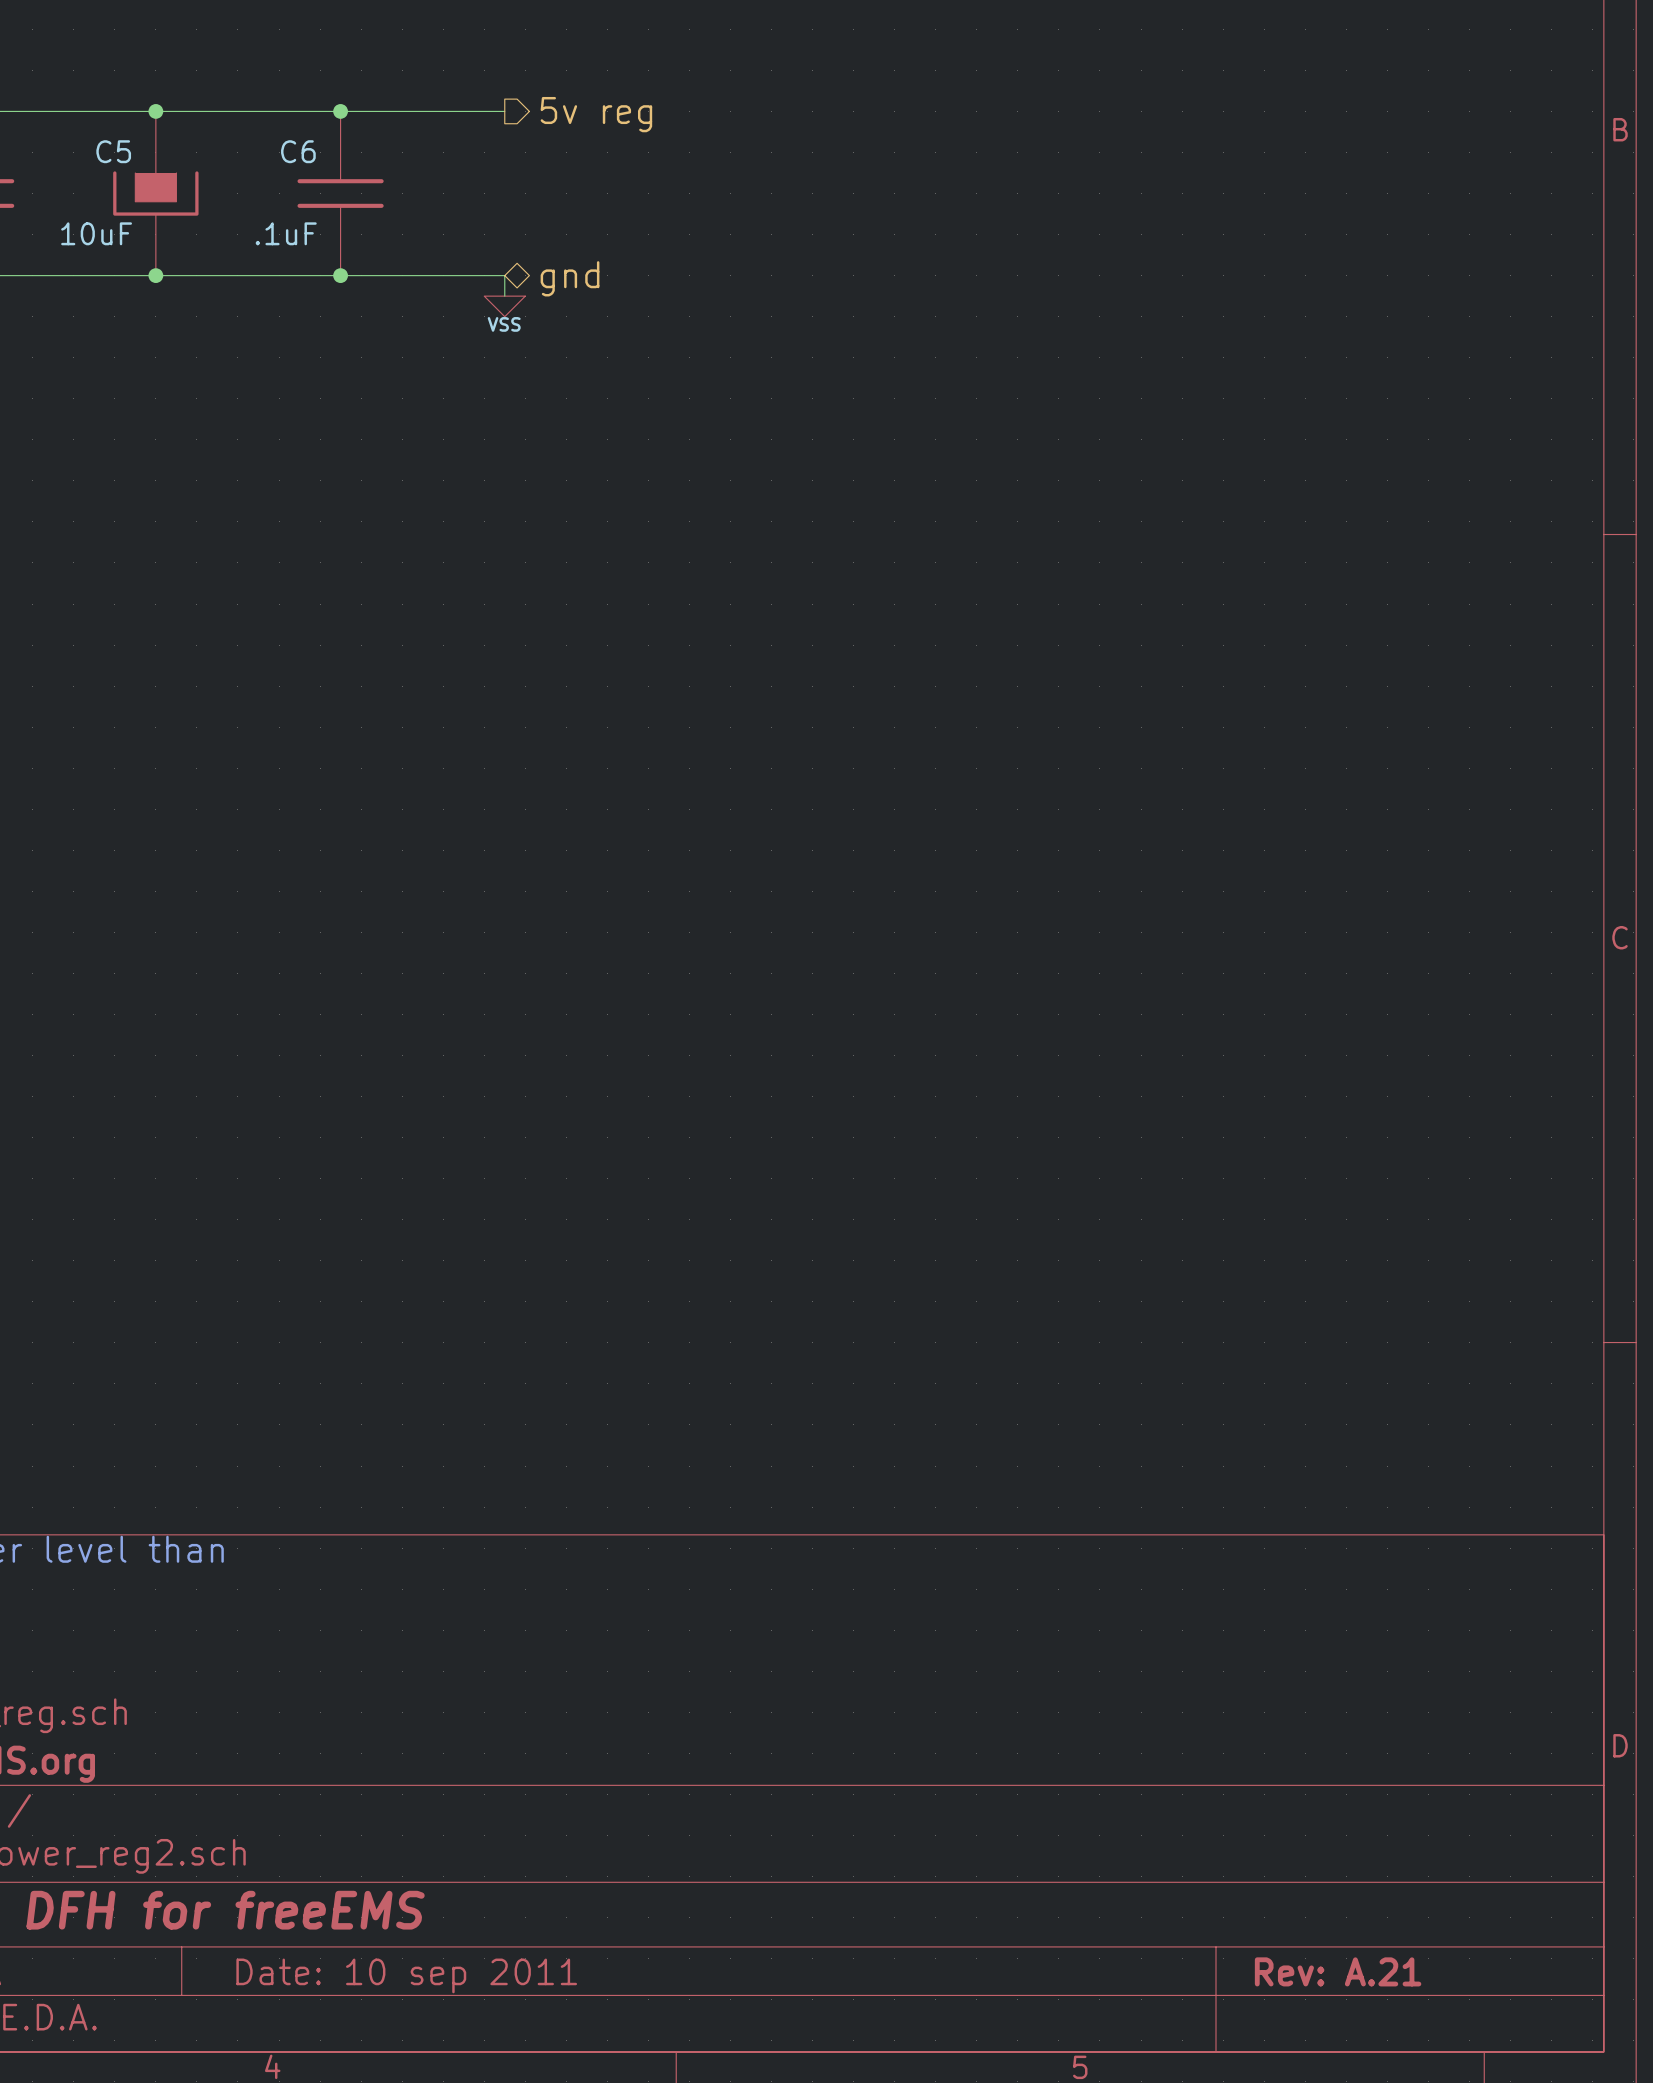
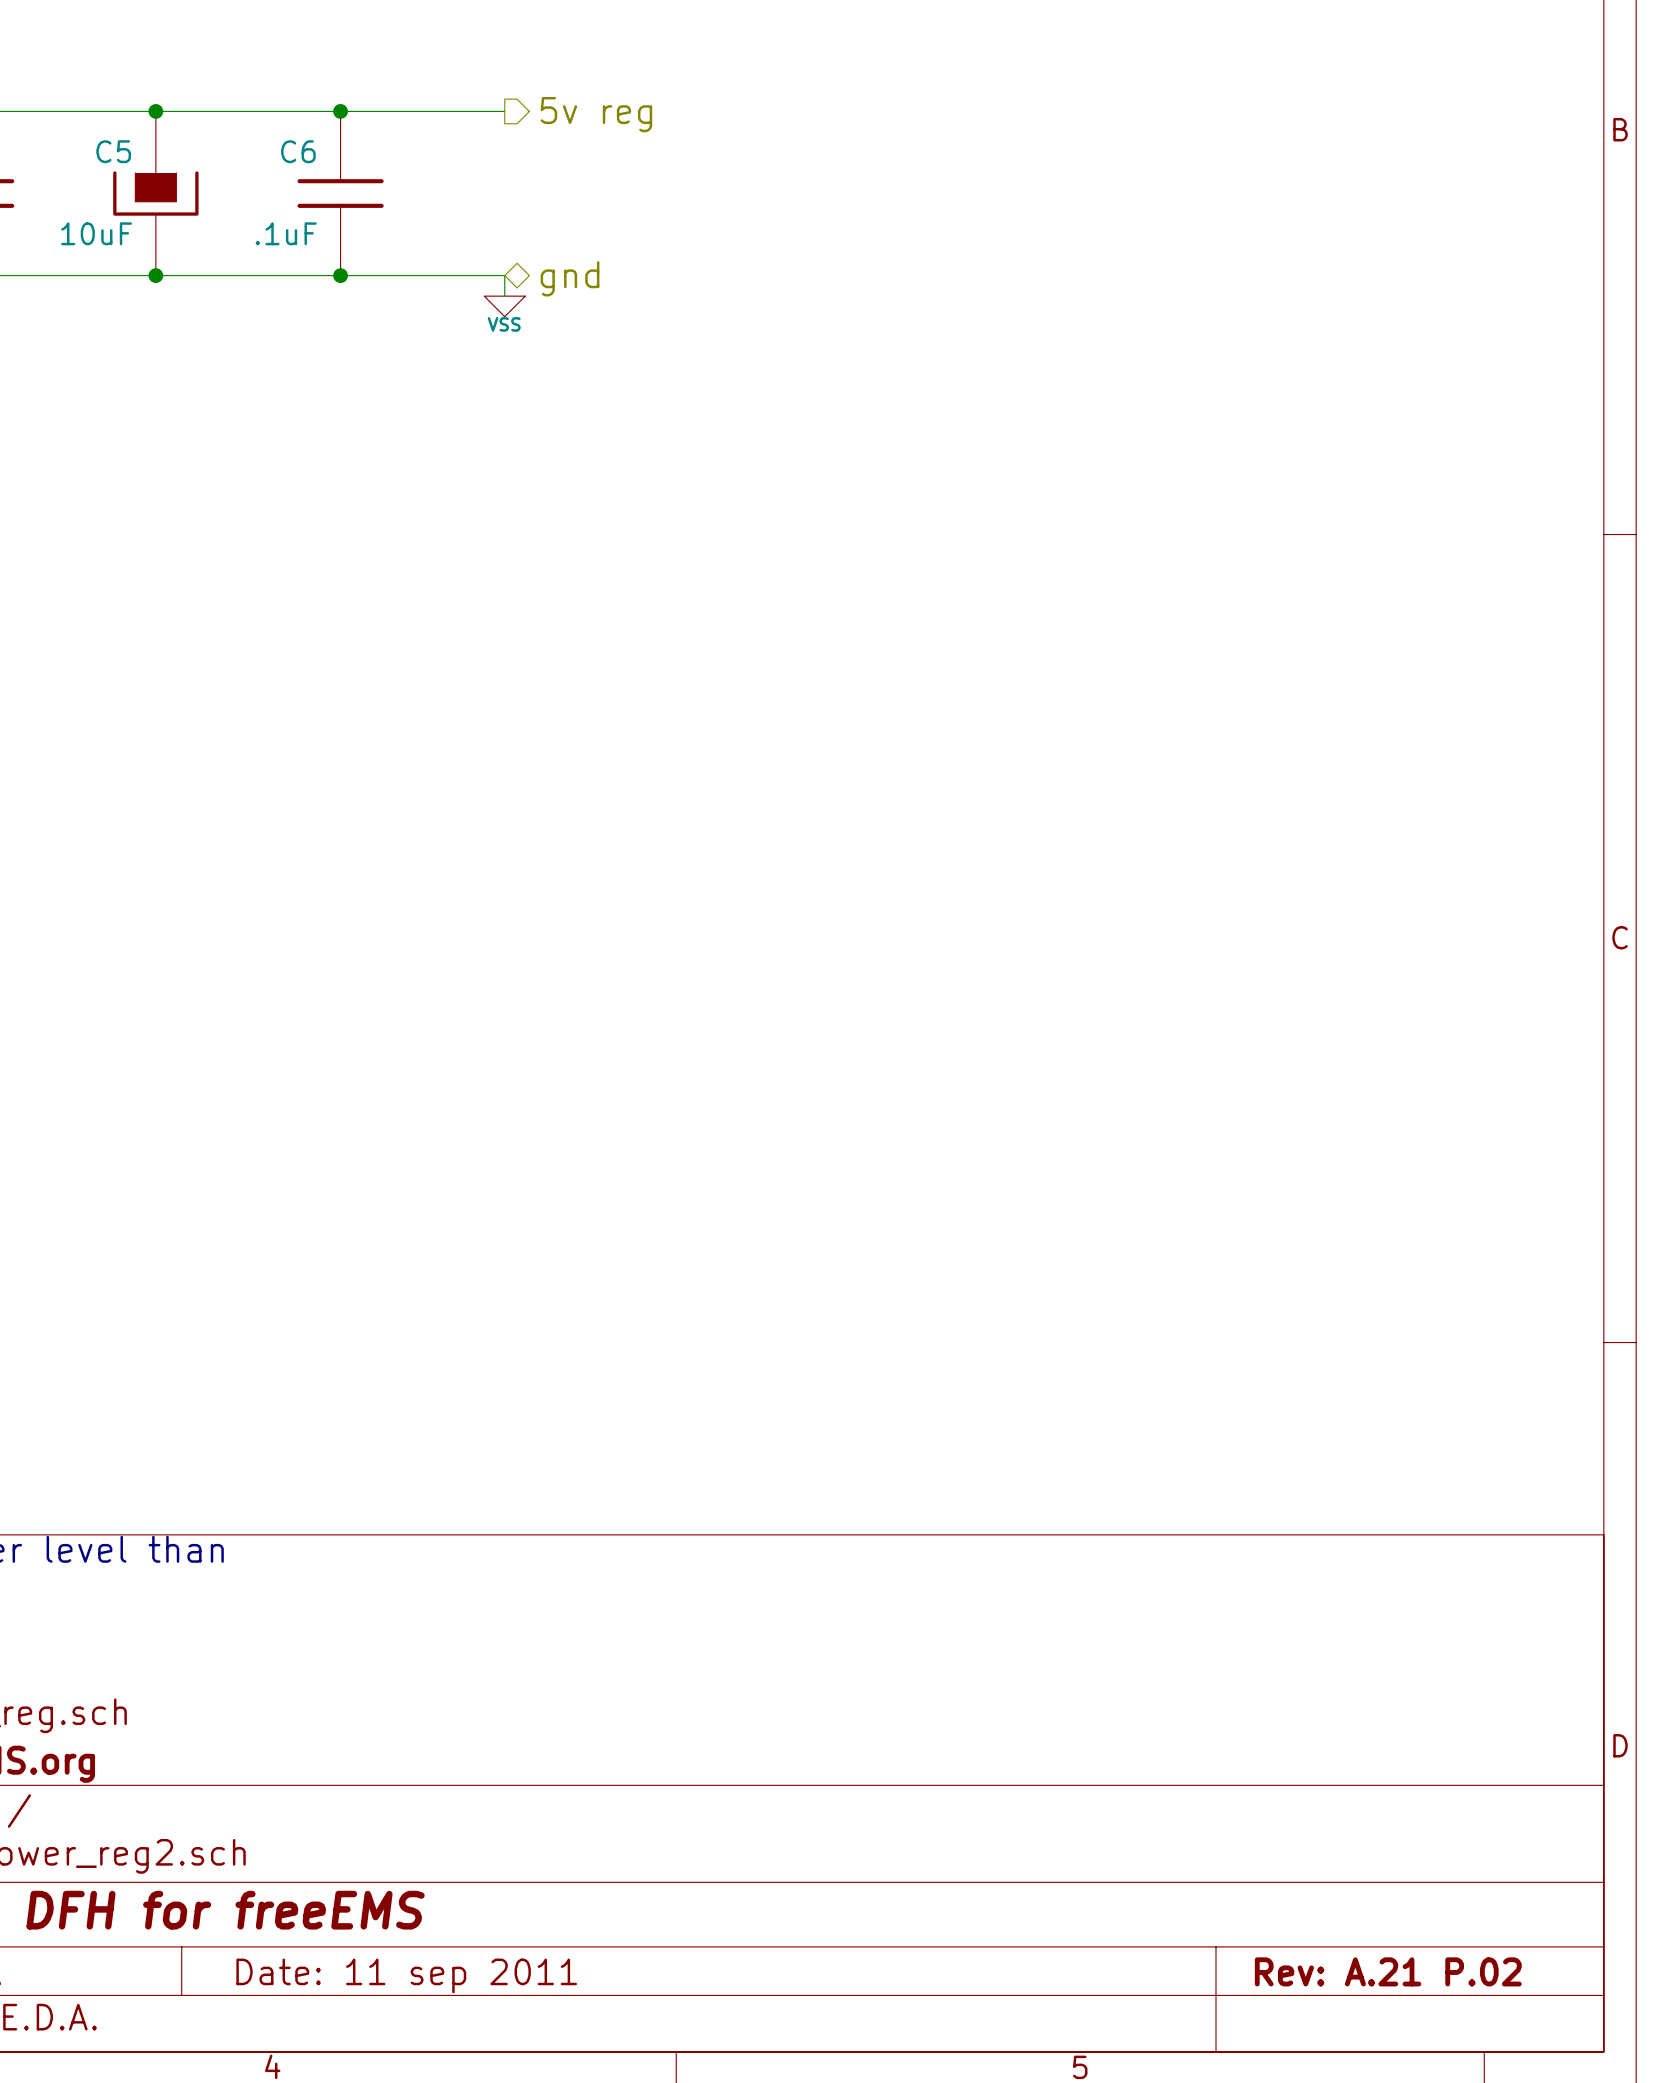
title block: Rev: A.21 (1338, 1971) -> Rev: A.21 P.02 (1388, 1971)
title block: Date: 10 sep 2011 (406, 1975) -> Date: 11 sep 2011 (406, 1975)

